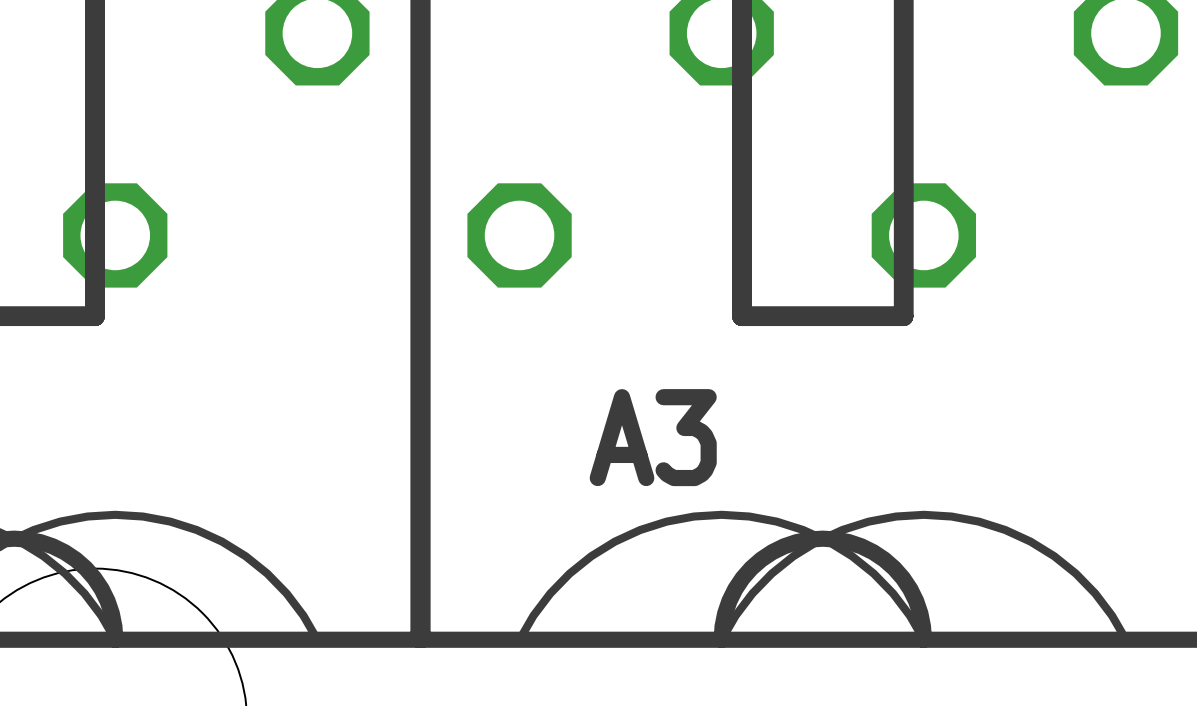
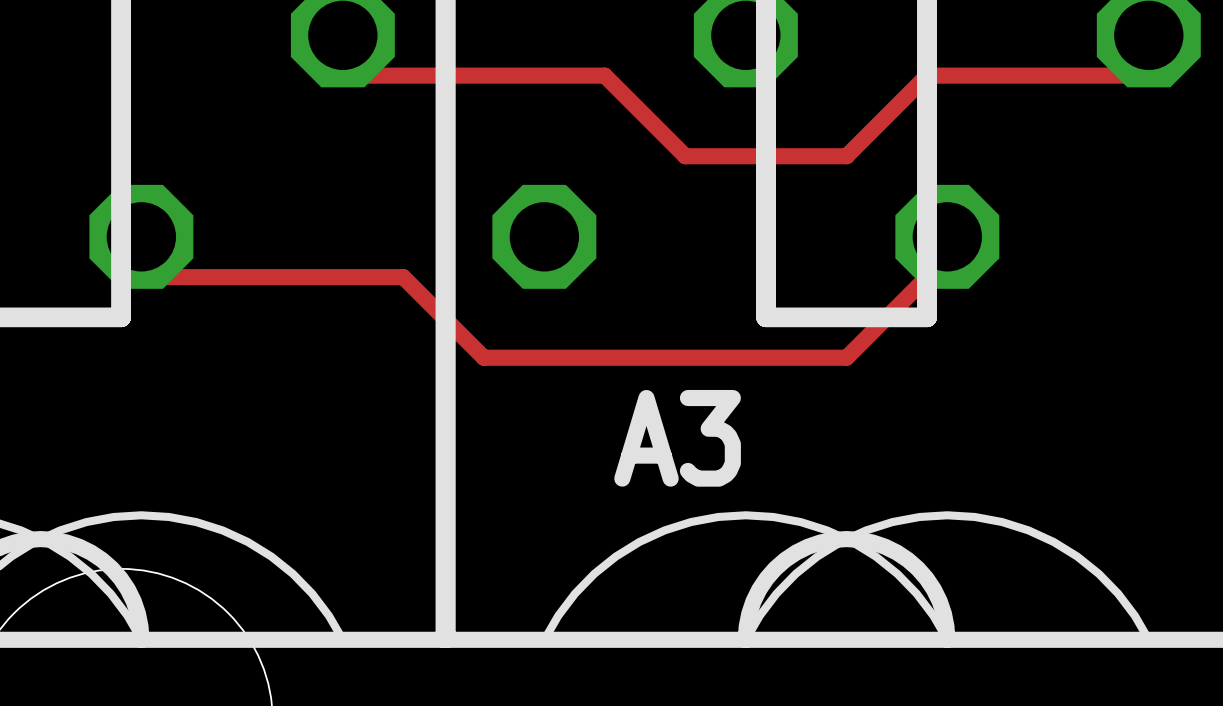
track: none -> (342, 35) (363, 75) (604, 75) (685, 156) (846, 156) (927, 75) (1128, 75) (1148, 35)
track: none -> (141, 236) (161, 277) (403, 277) (483, 357) (846, 357) (927, 277) (947, 236)

